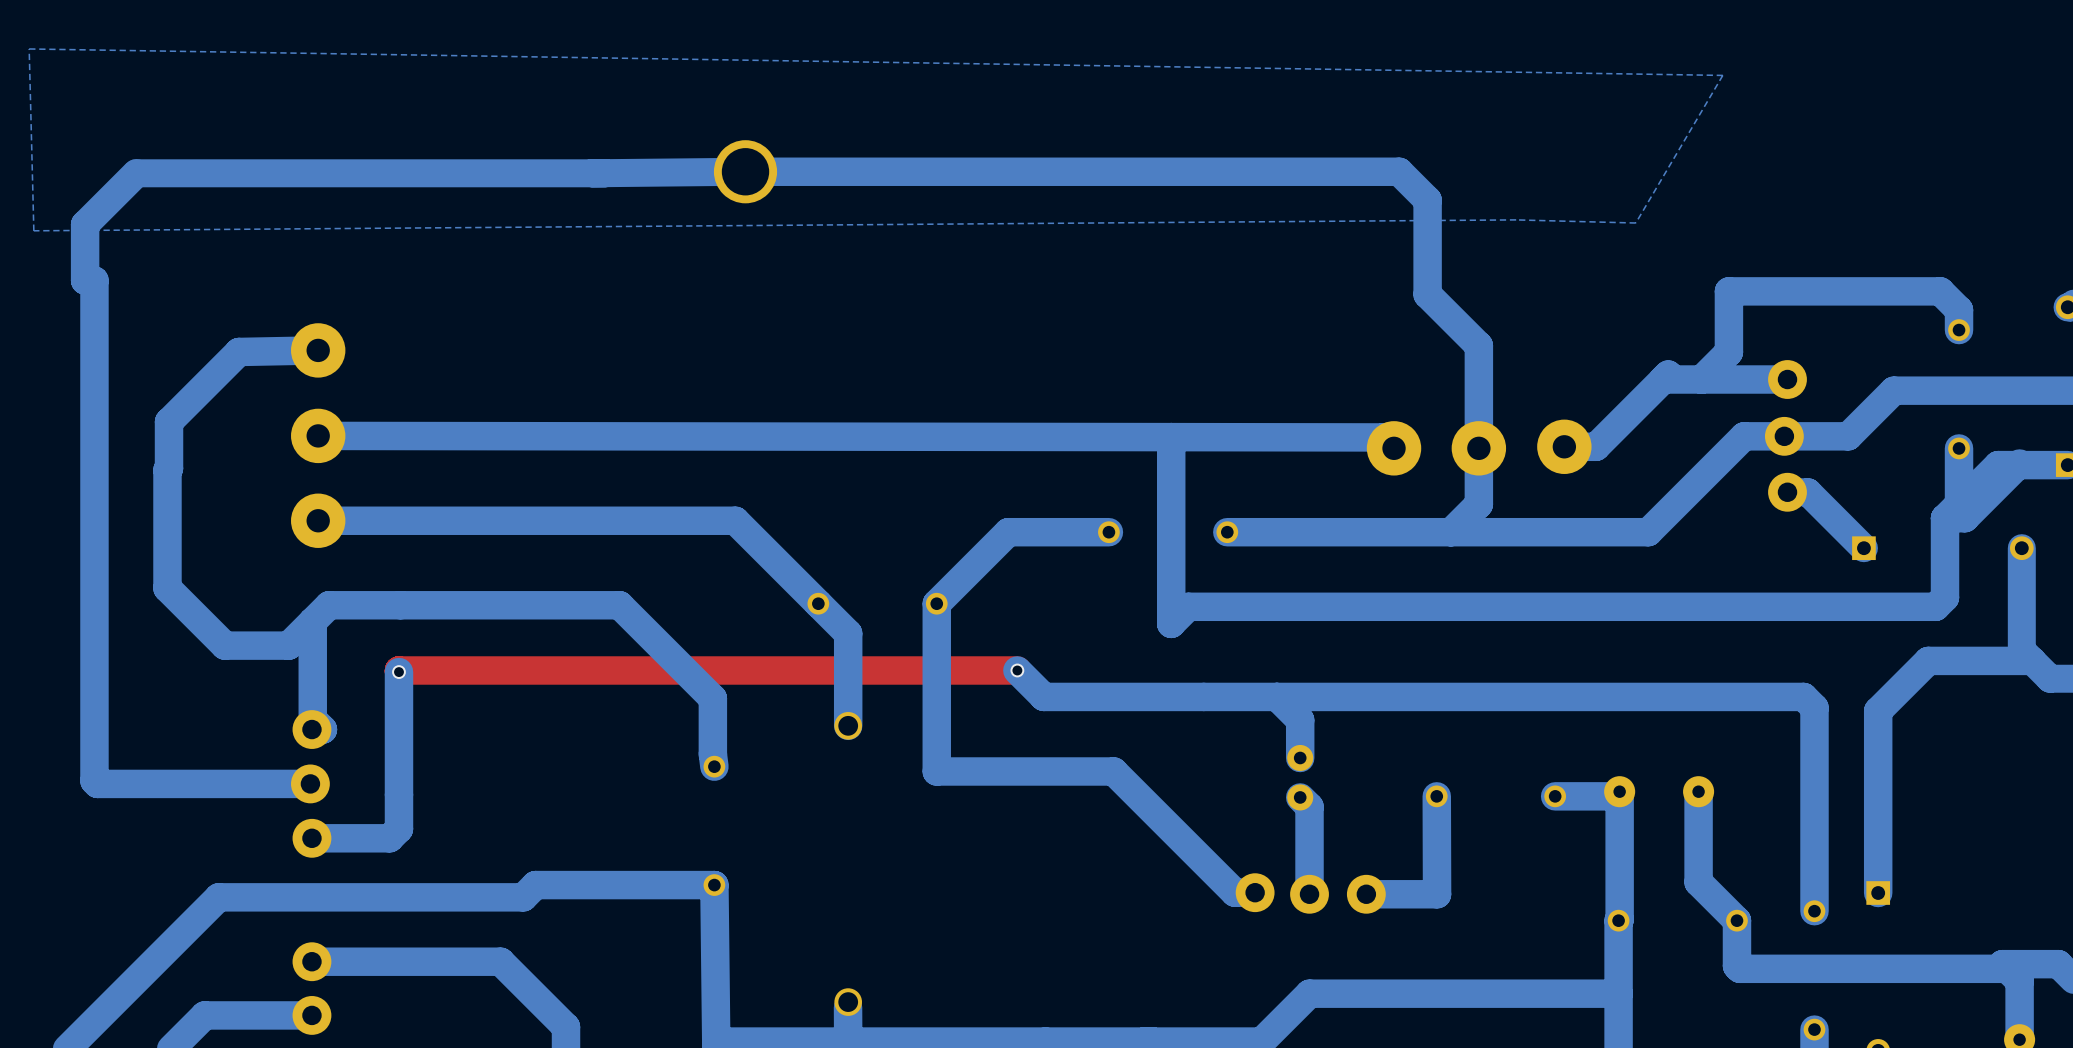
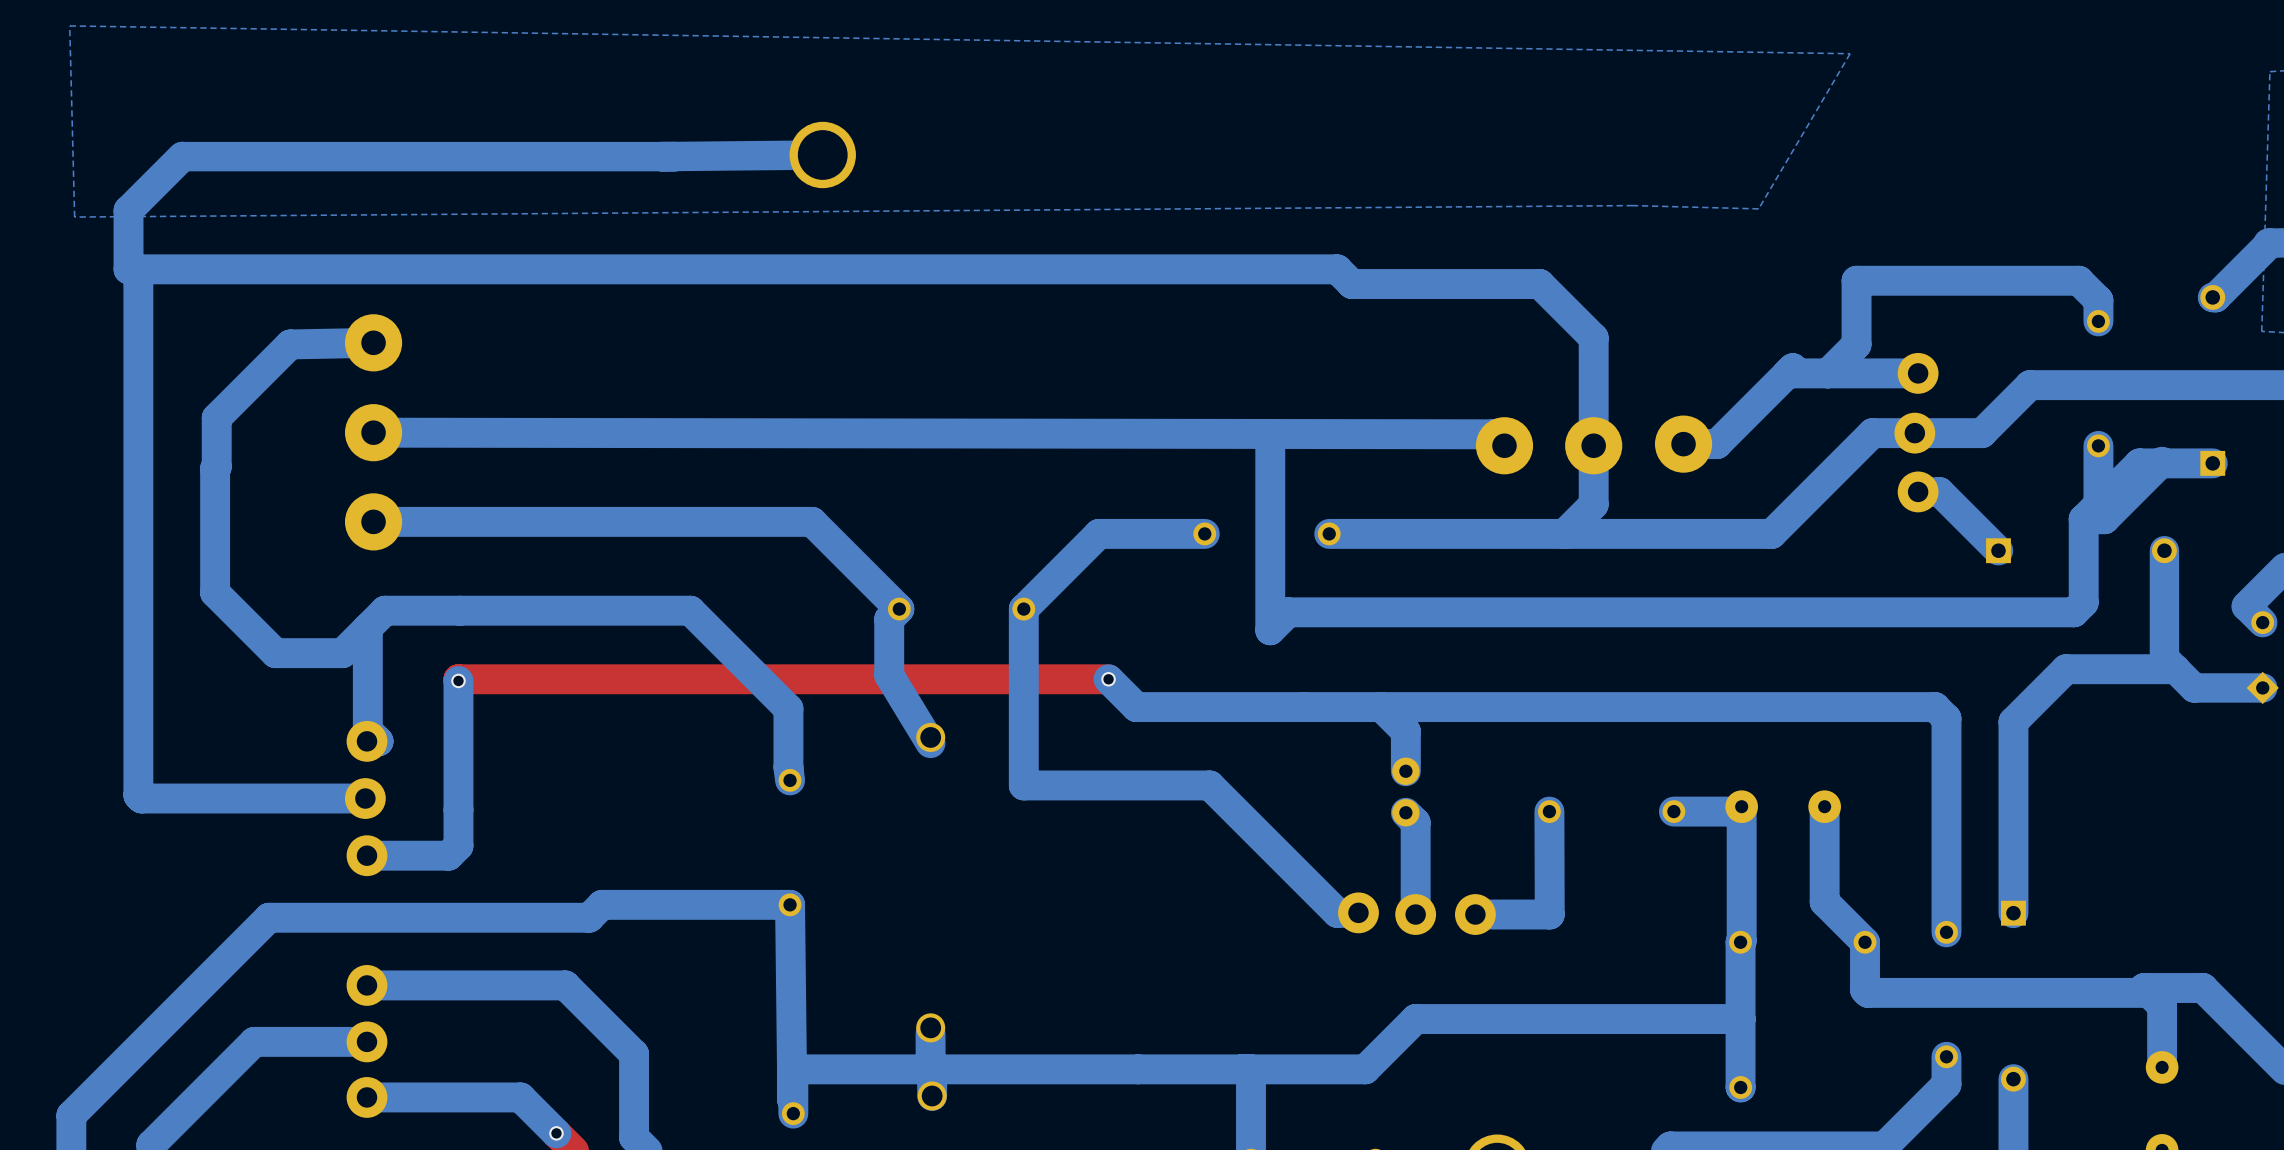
bottom track: (745, 171) (1399, 171) (1427, 200) (1427, 294) -> (138, 269) (1337, 269) (1351, 284) (1539, 284)
bottom track: (818, 603) (848, 633) (848, 725) -> (899, 609) (889, 619) (889, 675) (930, 743)

